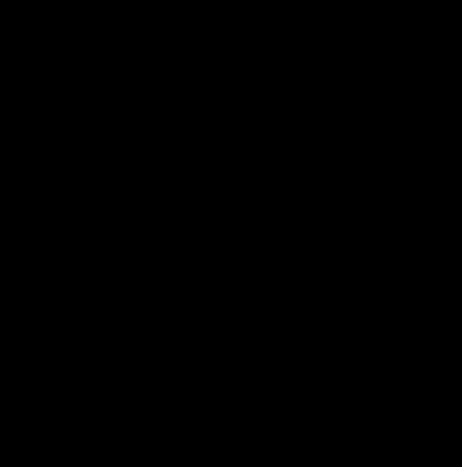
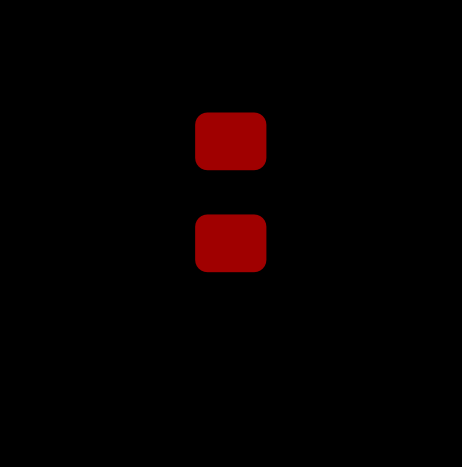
part: none -> (230, 192)

